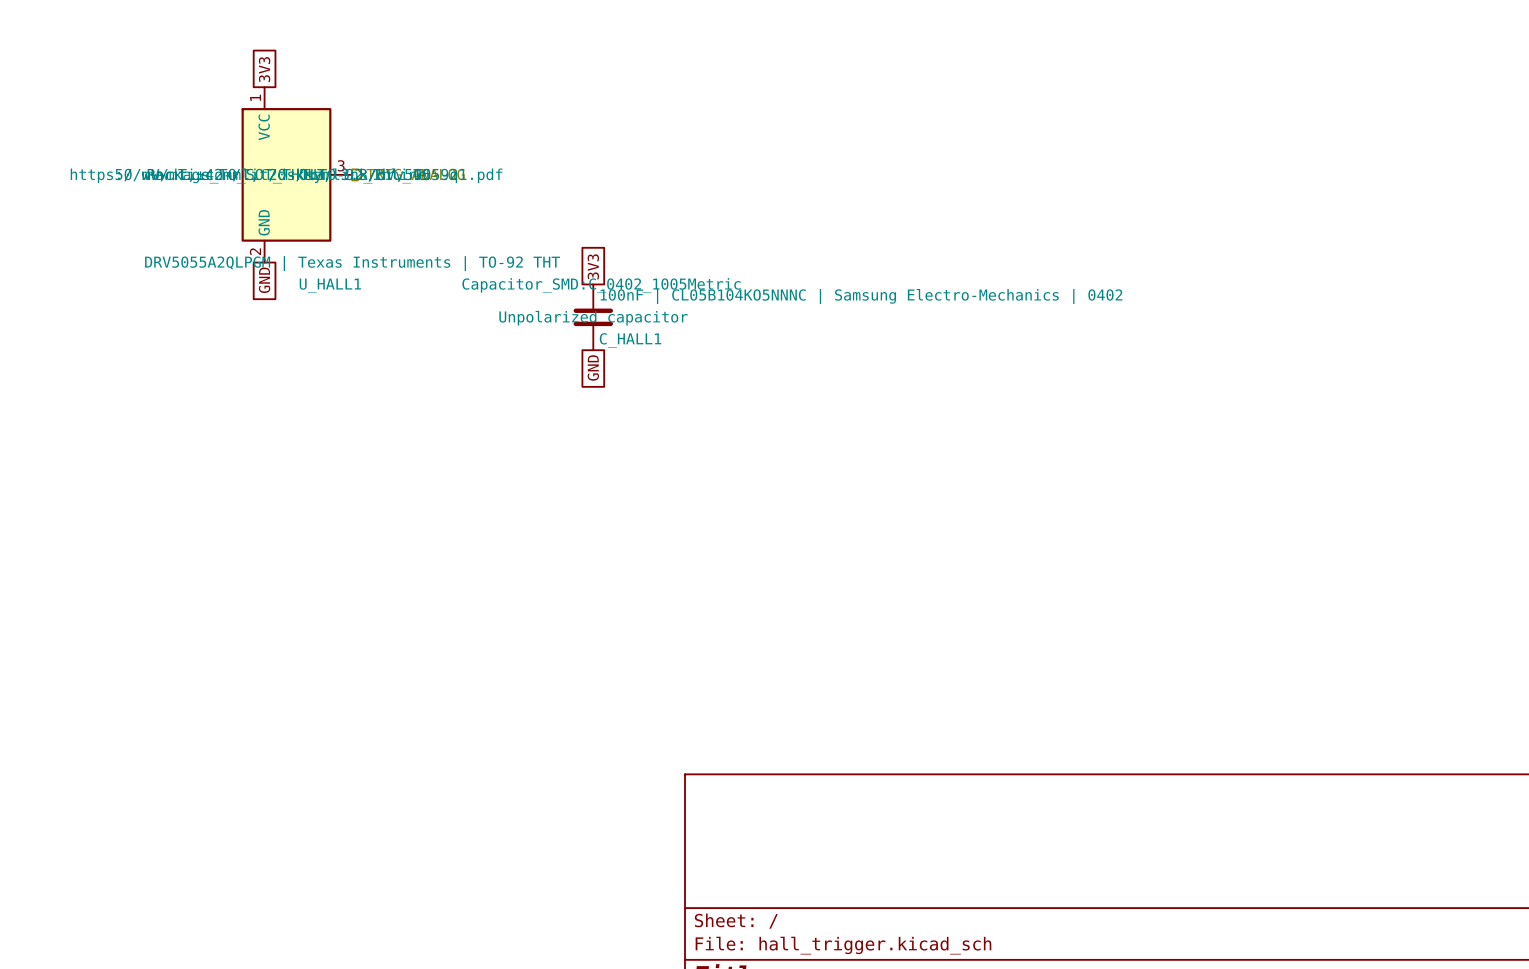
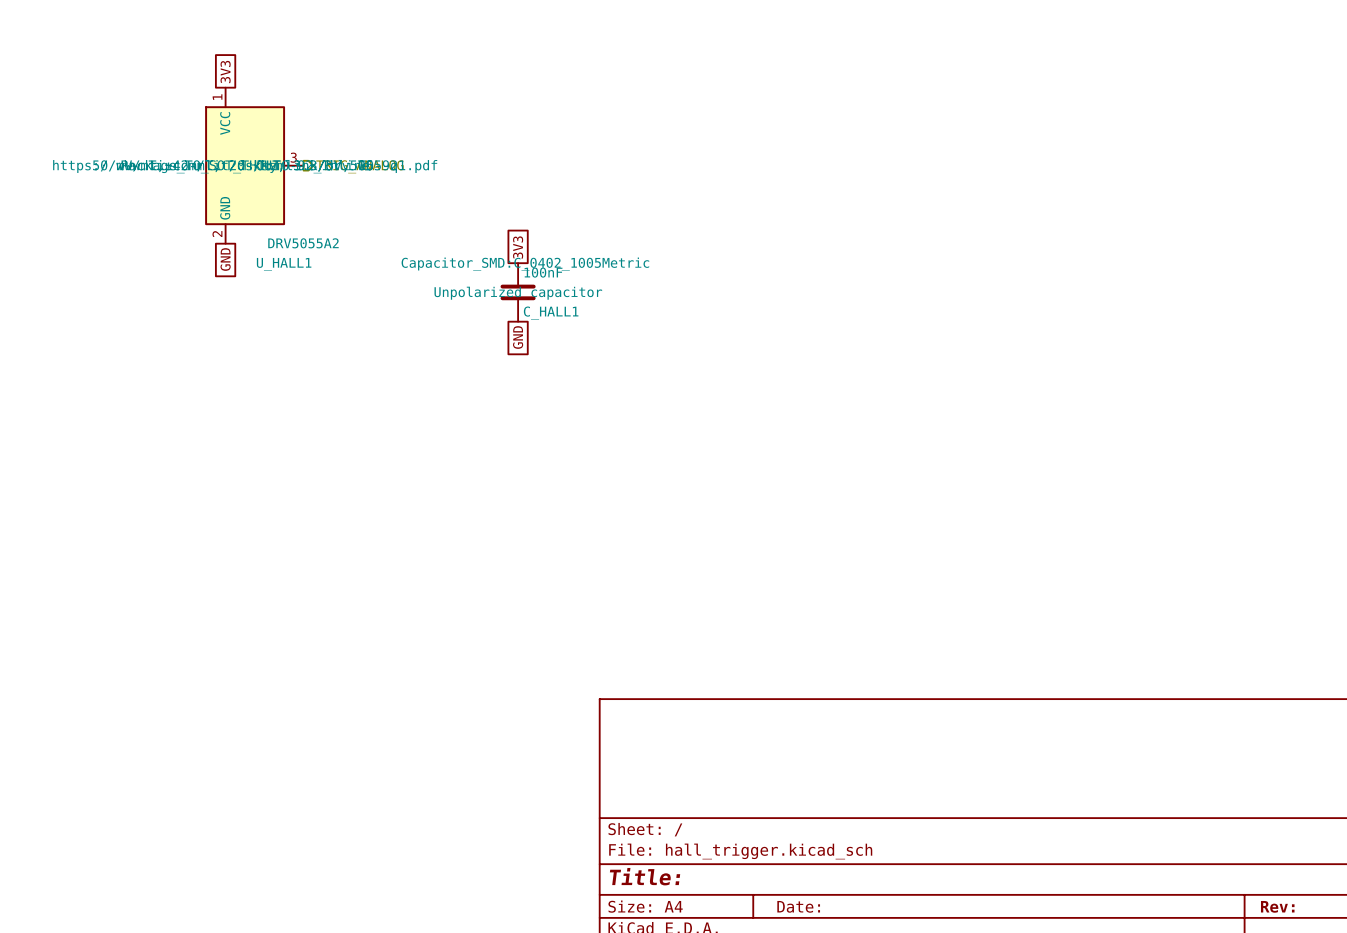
U_HALL1 value: DRV5055A2QLPGM | Texas Instruments | TO-92 THT (352, 263) -> DRV5055A2 (303, 243)
C_HALL1 value: 100nF | CL05B104KO5NNNC | Samsung Electro-Mechanics | 0402 (861, 296) -> 100nF (543, 272)

